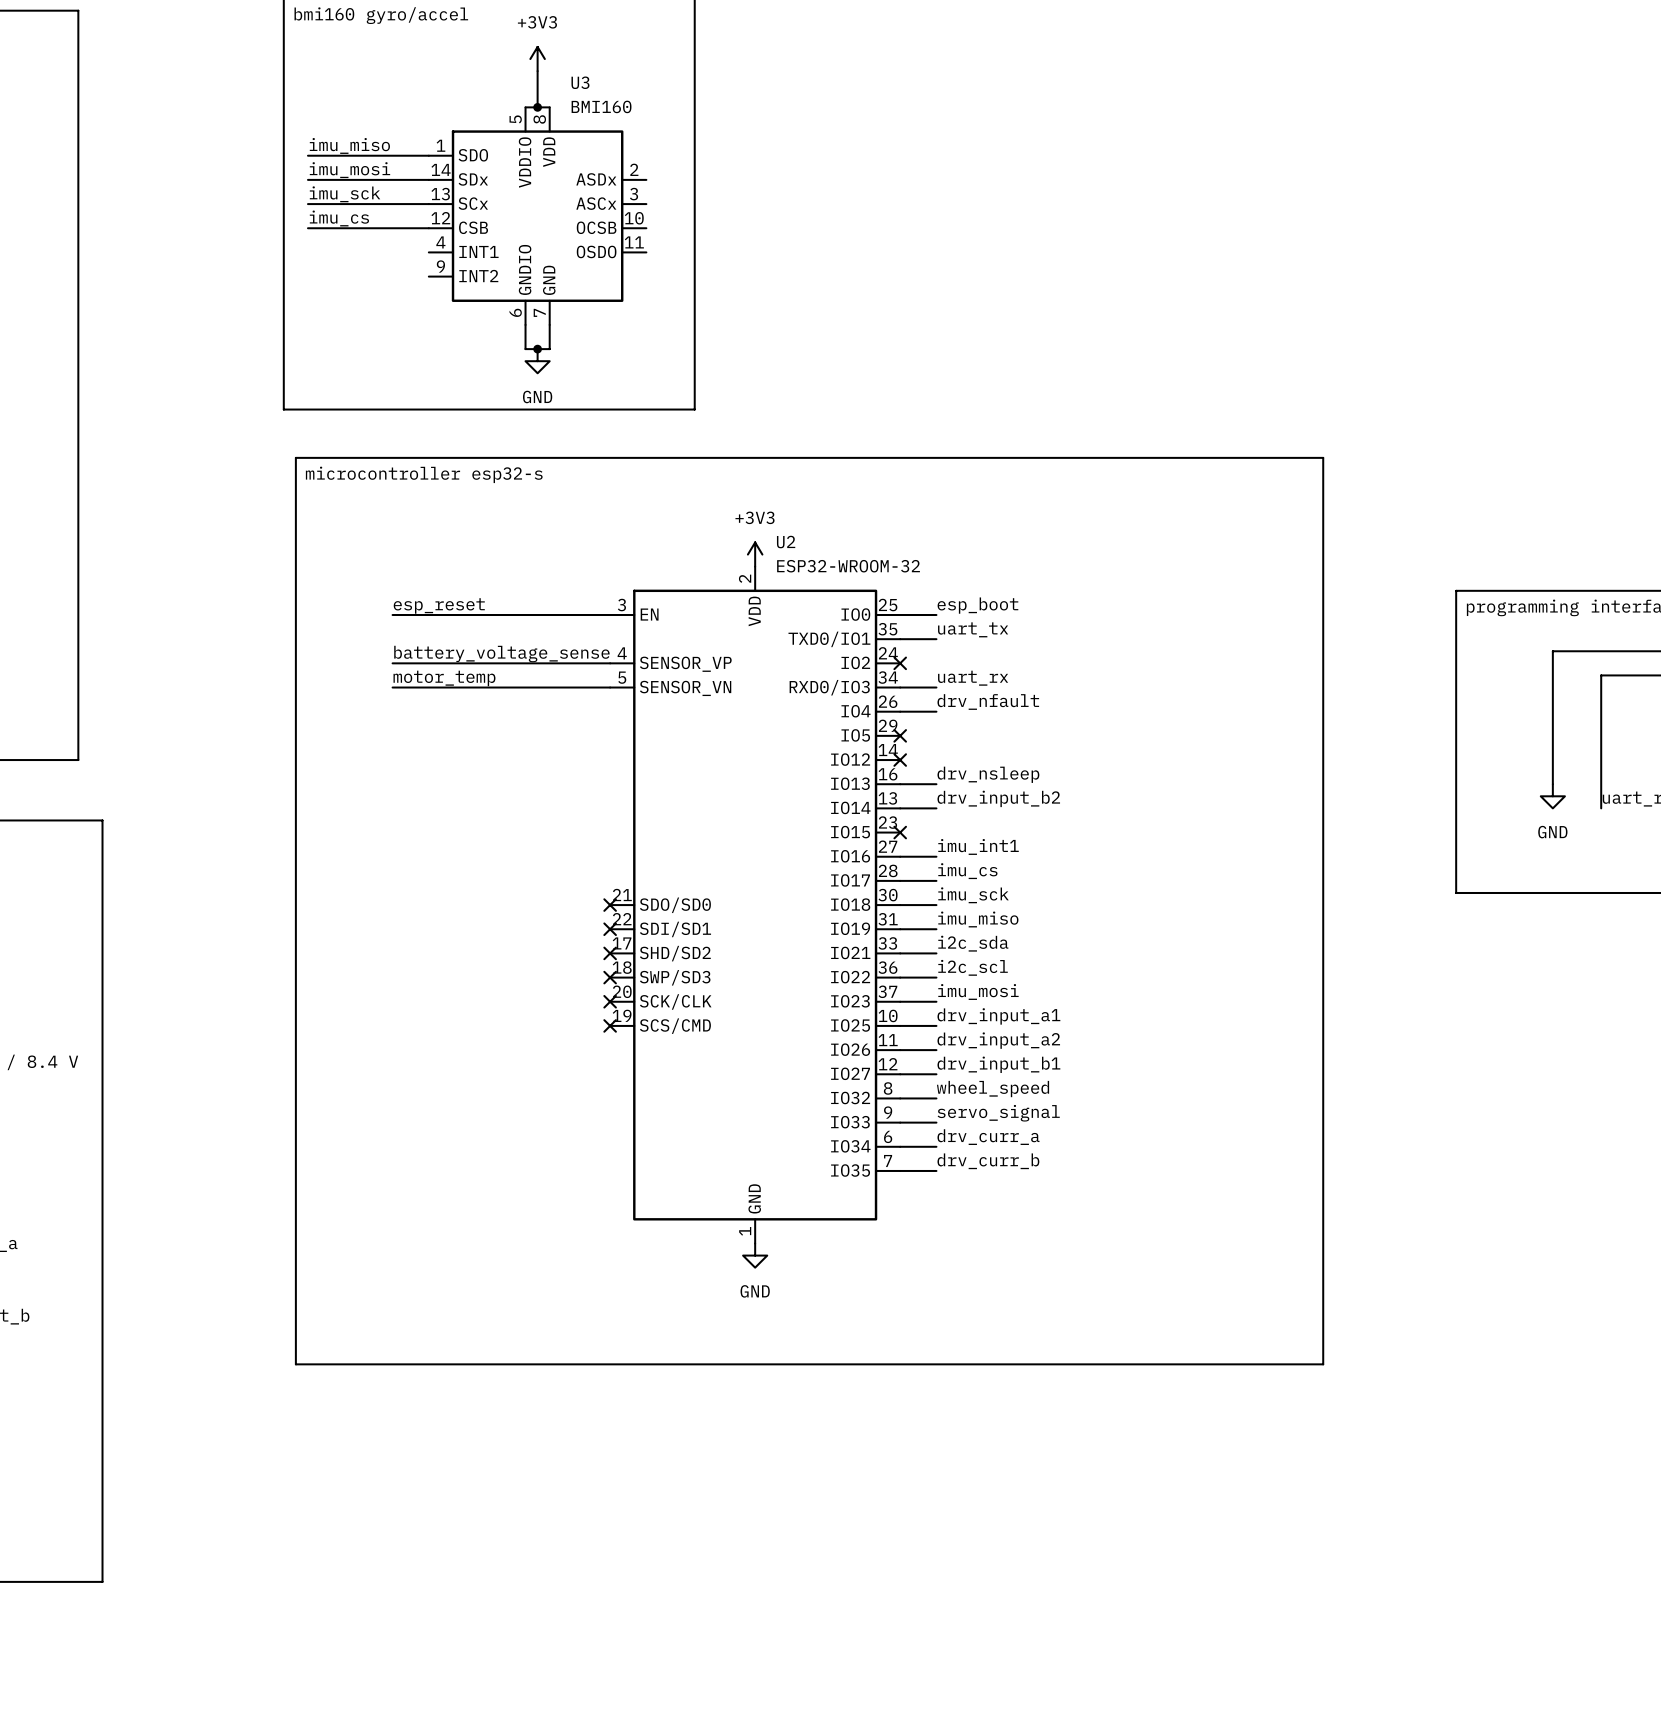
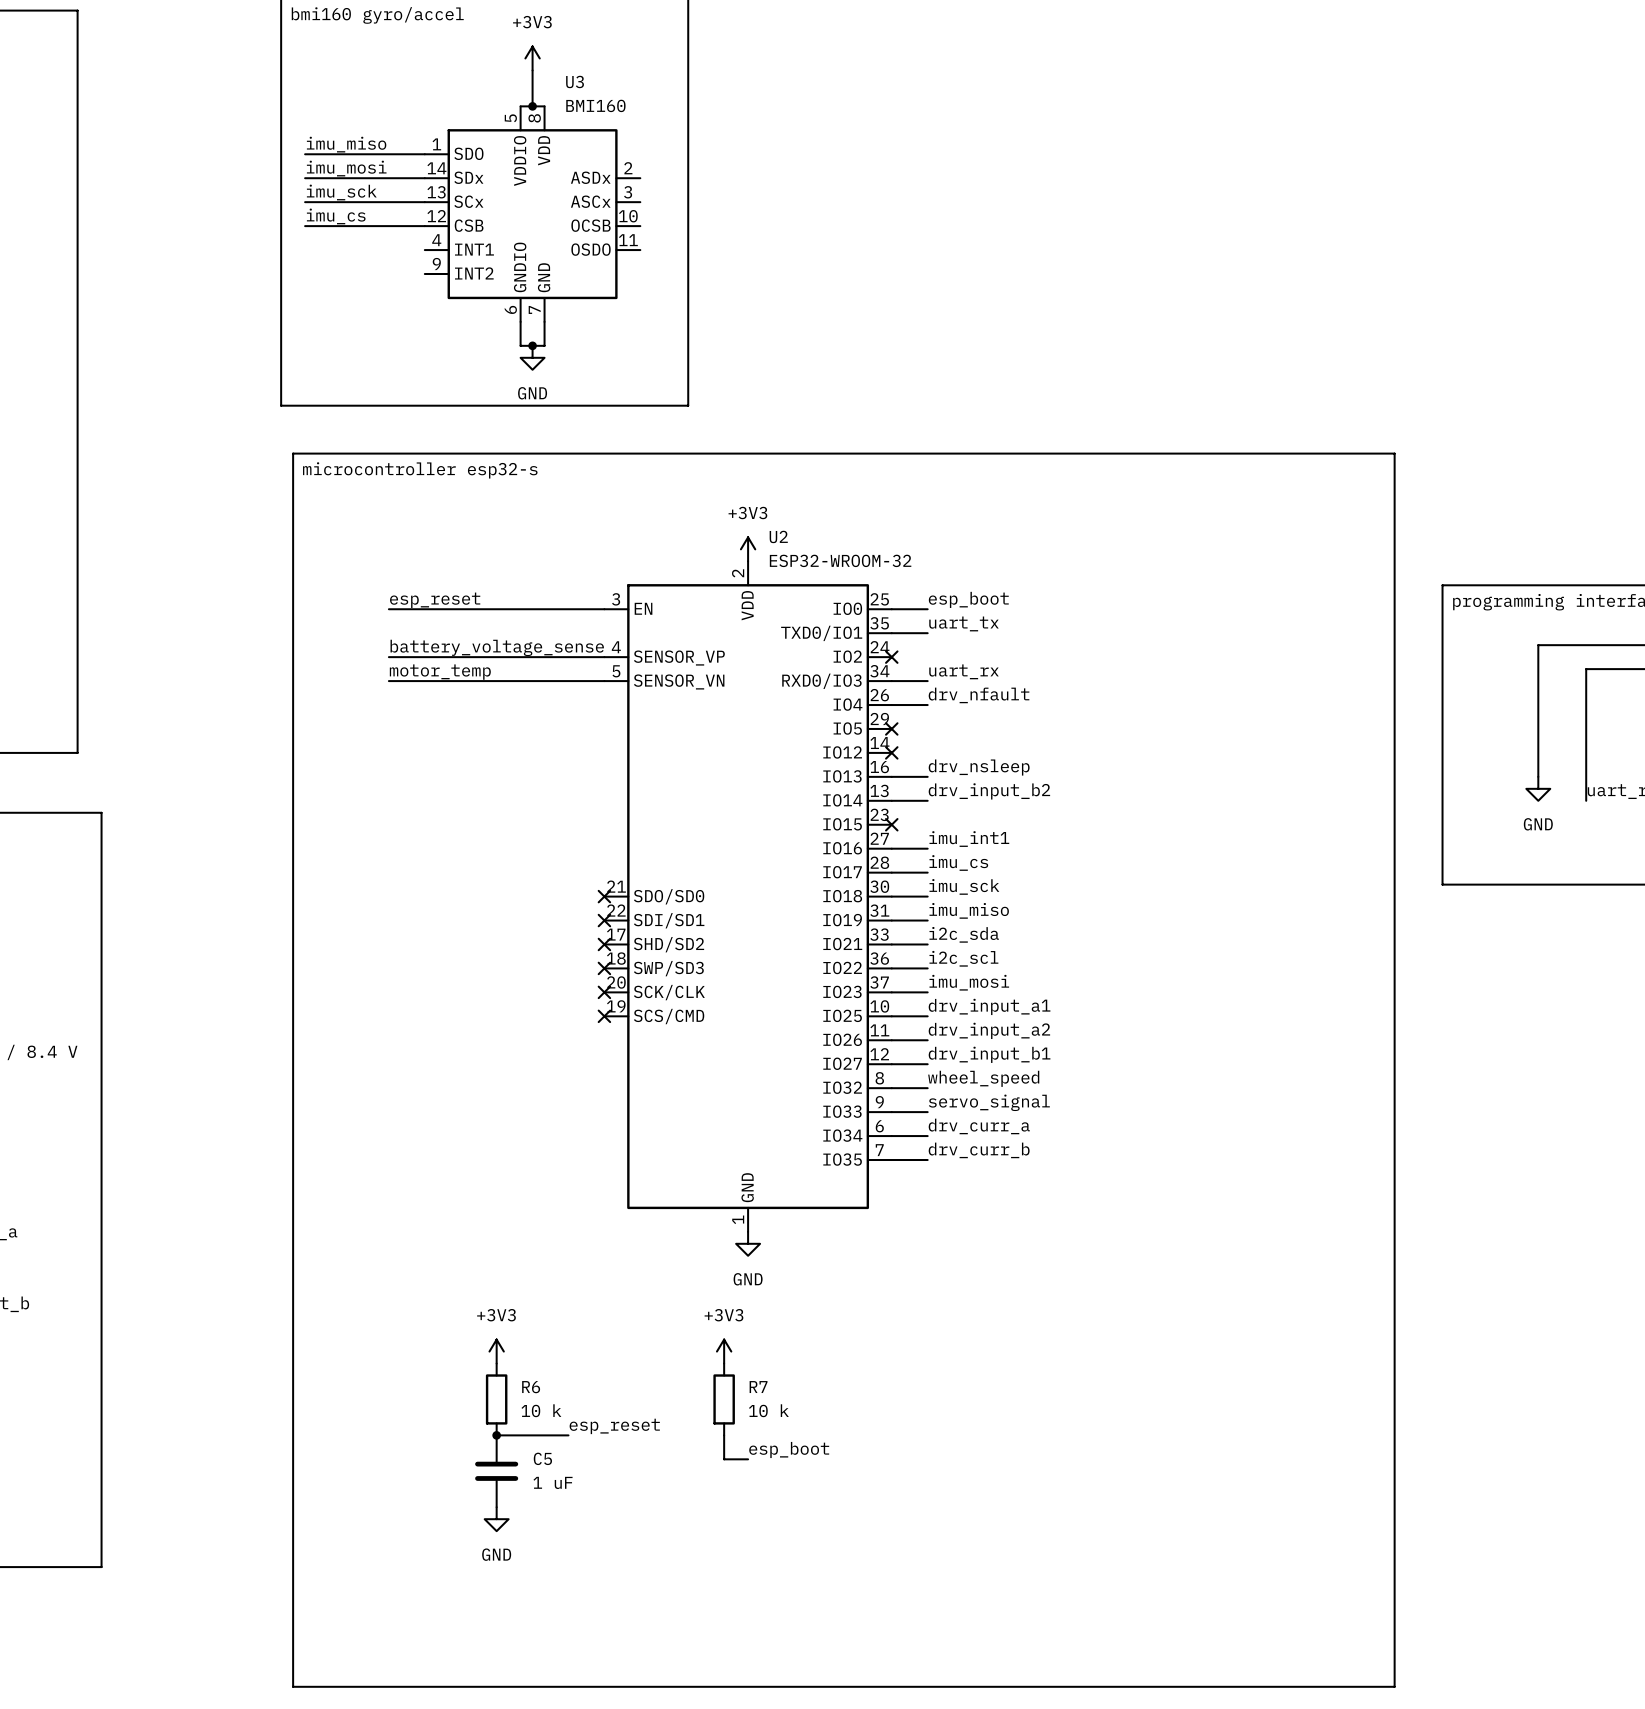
line: (1323, 457) (1323, 1364) (295, 1364) -> (1310, 453) (1394, 453) (1394, 1686) (293, 1686) (293, 1351)
power symbol: none -> +3V3 (496, 1351)
power symbol: none -> +3V3 (724, 1351)
R6: none -> 10 k (496, 1399)
R7: none -> 10 k (724, 1399)
label: none -> esp_reset (614, 1426)
wire: none -> (496, 1435) (568, 1435)
junction: none -> (496, 1435)
wire: none -> (724, 1435) (724, 1459) (748, 1459)
label: none -> esp_boot (789, 1449)
C5: none -> 1 uF (496, 1471)
power symbol: none -> GND (496, 1519)

